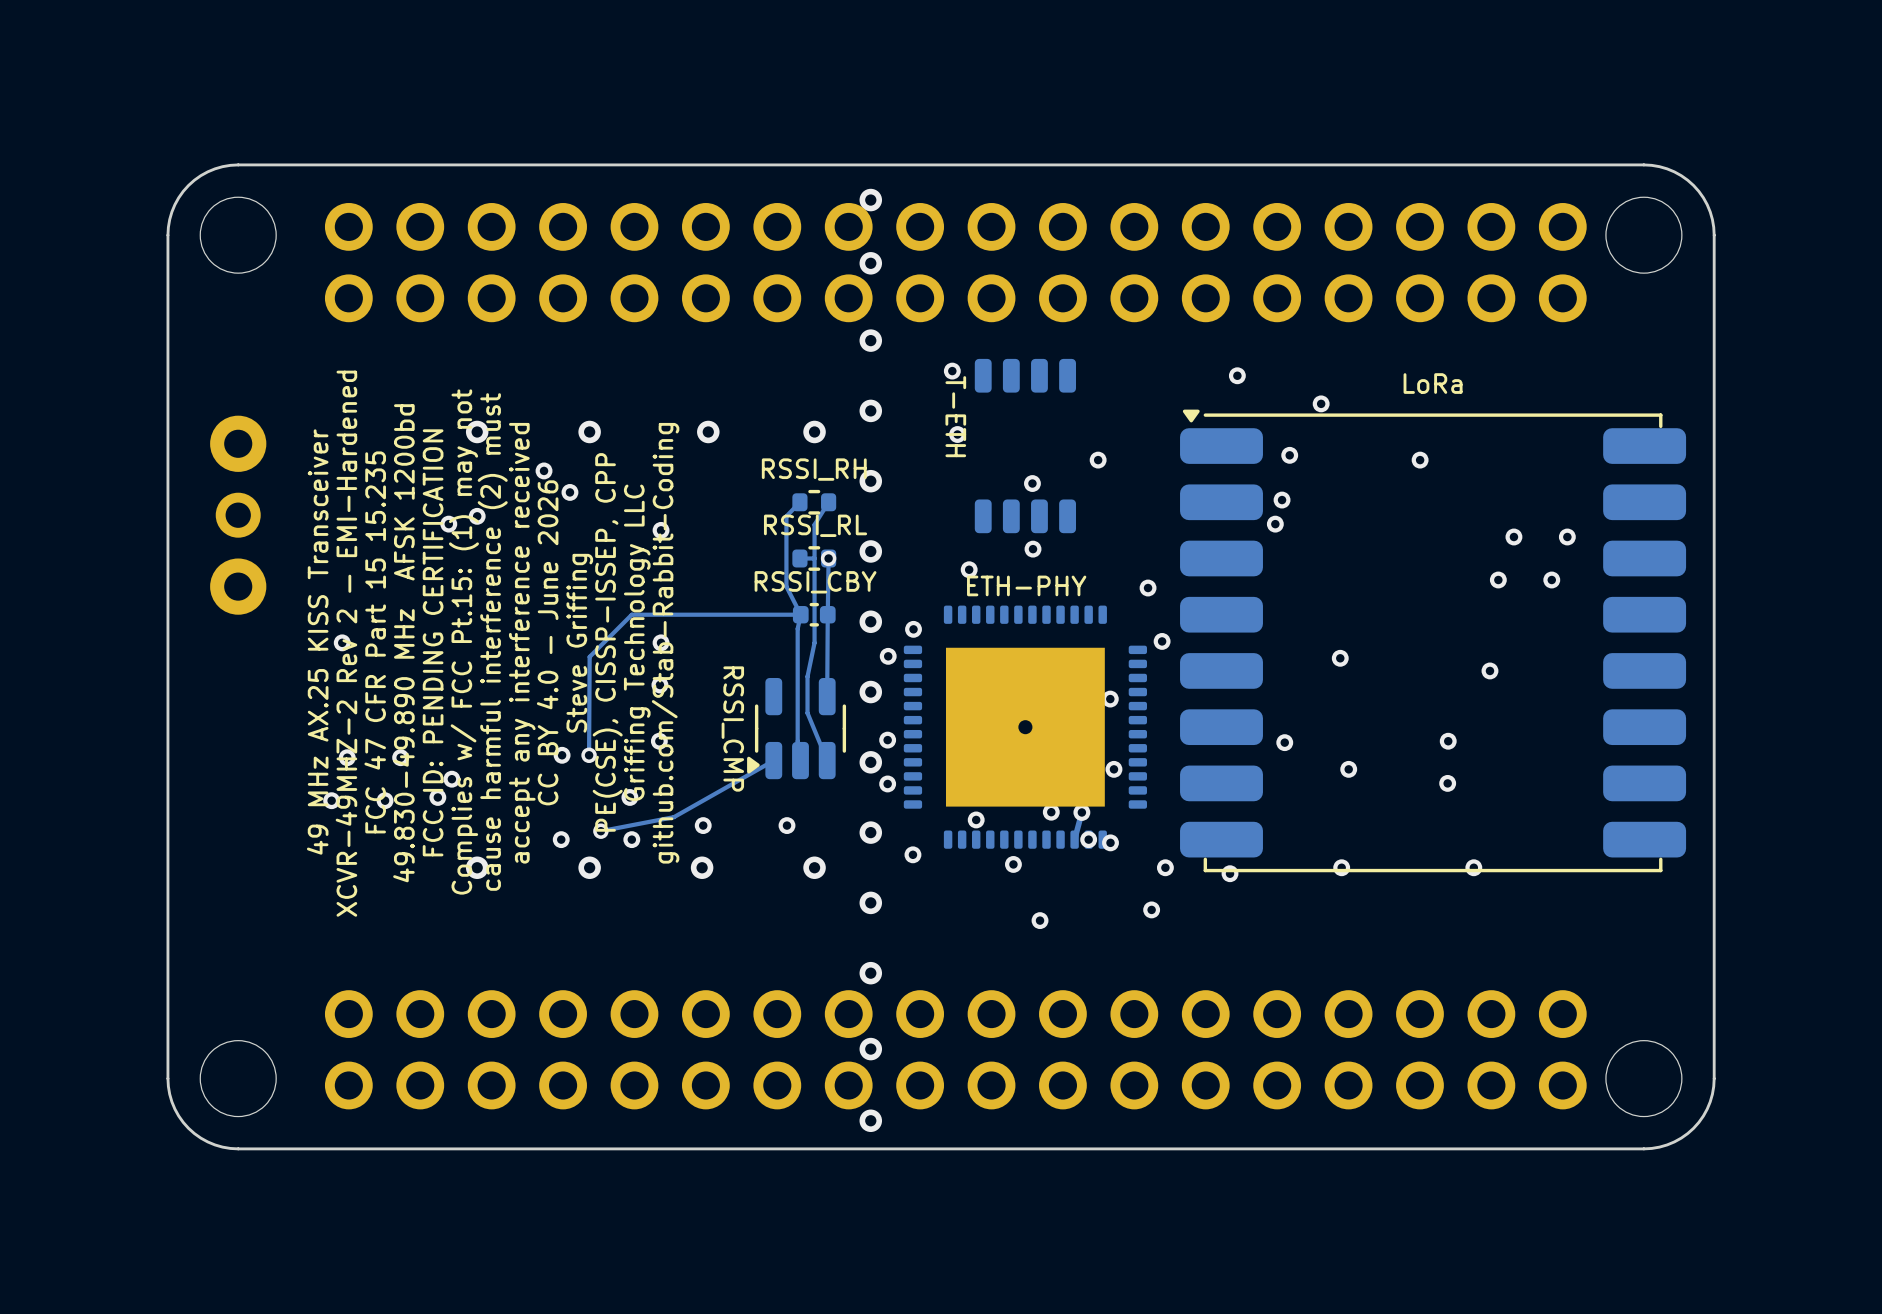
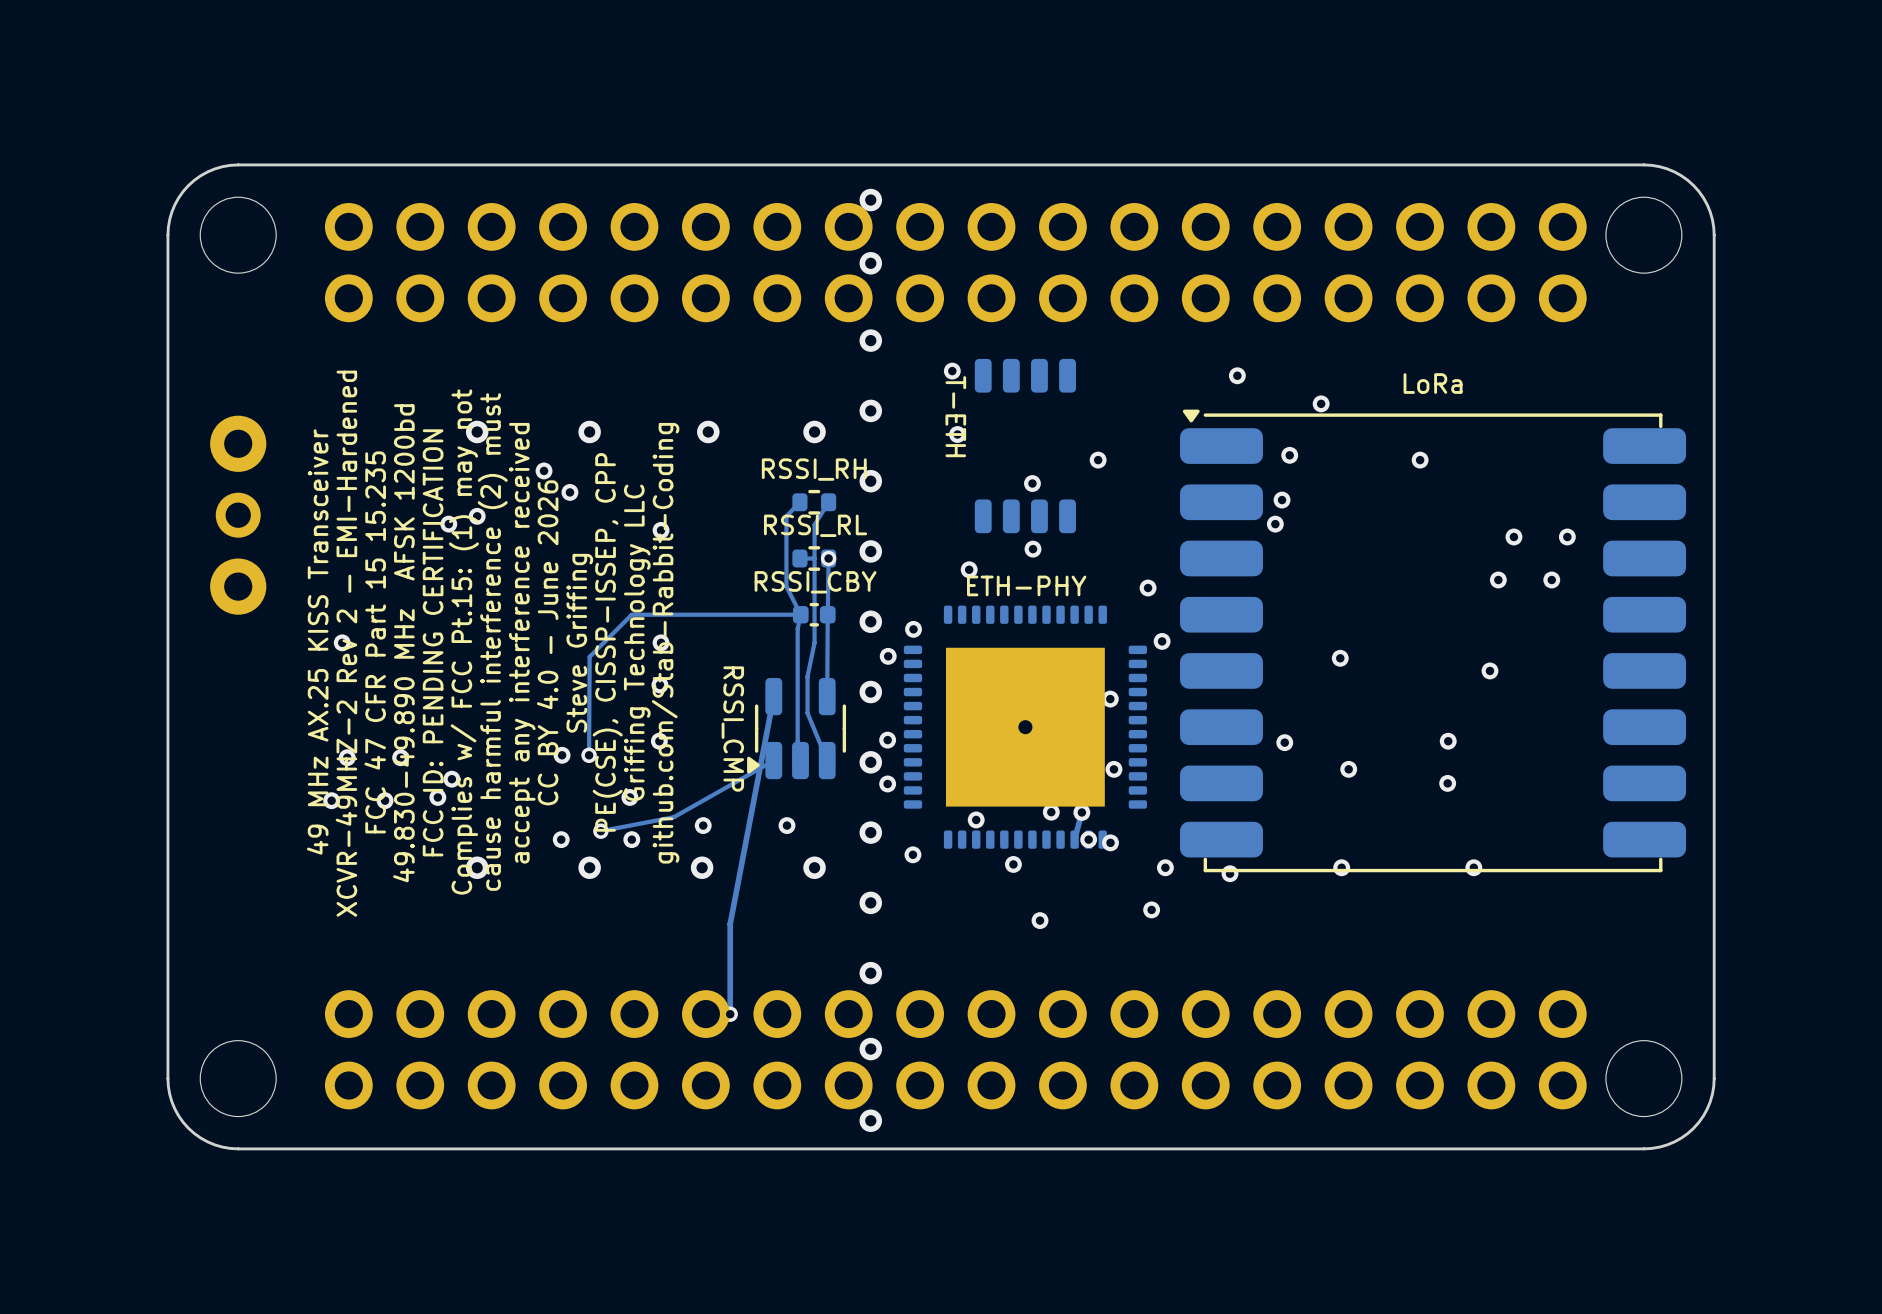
track: none -> (773, 696) (730, 923) (730, 1014)
via: none -> (730, 1014)

